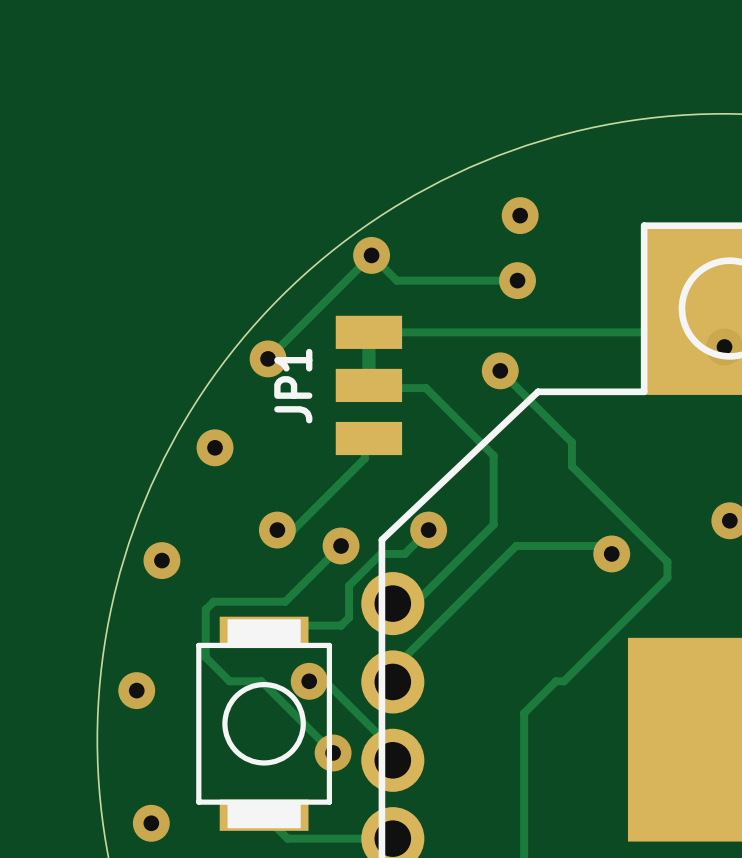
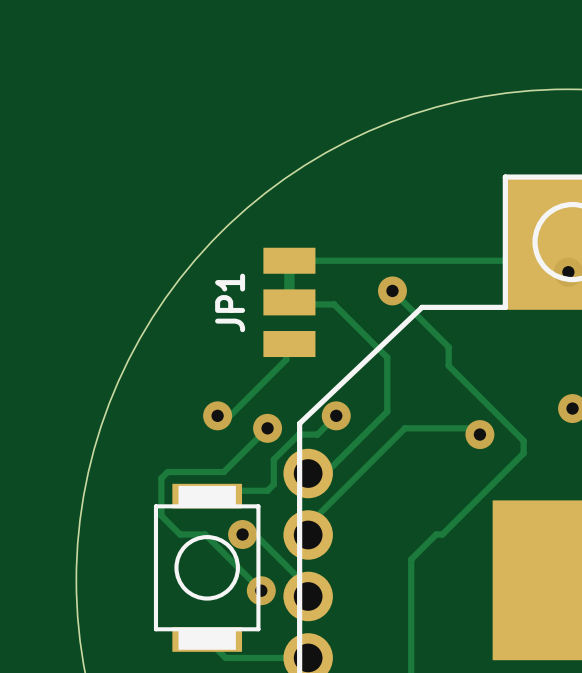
via: (520, 215) -> none
via: (371, 255) -> none
track: (517, 280) (396, 280) (371, 255) (268, 358) -> none
via: (517, 280) -> none
via: (268, 358) -> none
via: (215, 447) -> none
via: (161, 560) -> none
via: (136, 690) -> none
via: (151, 823) -> none

